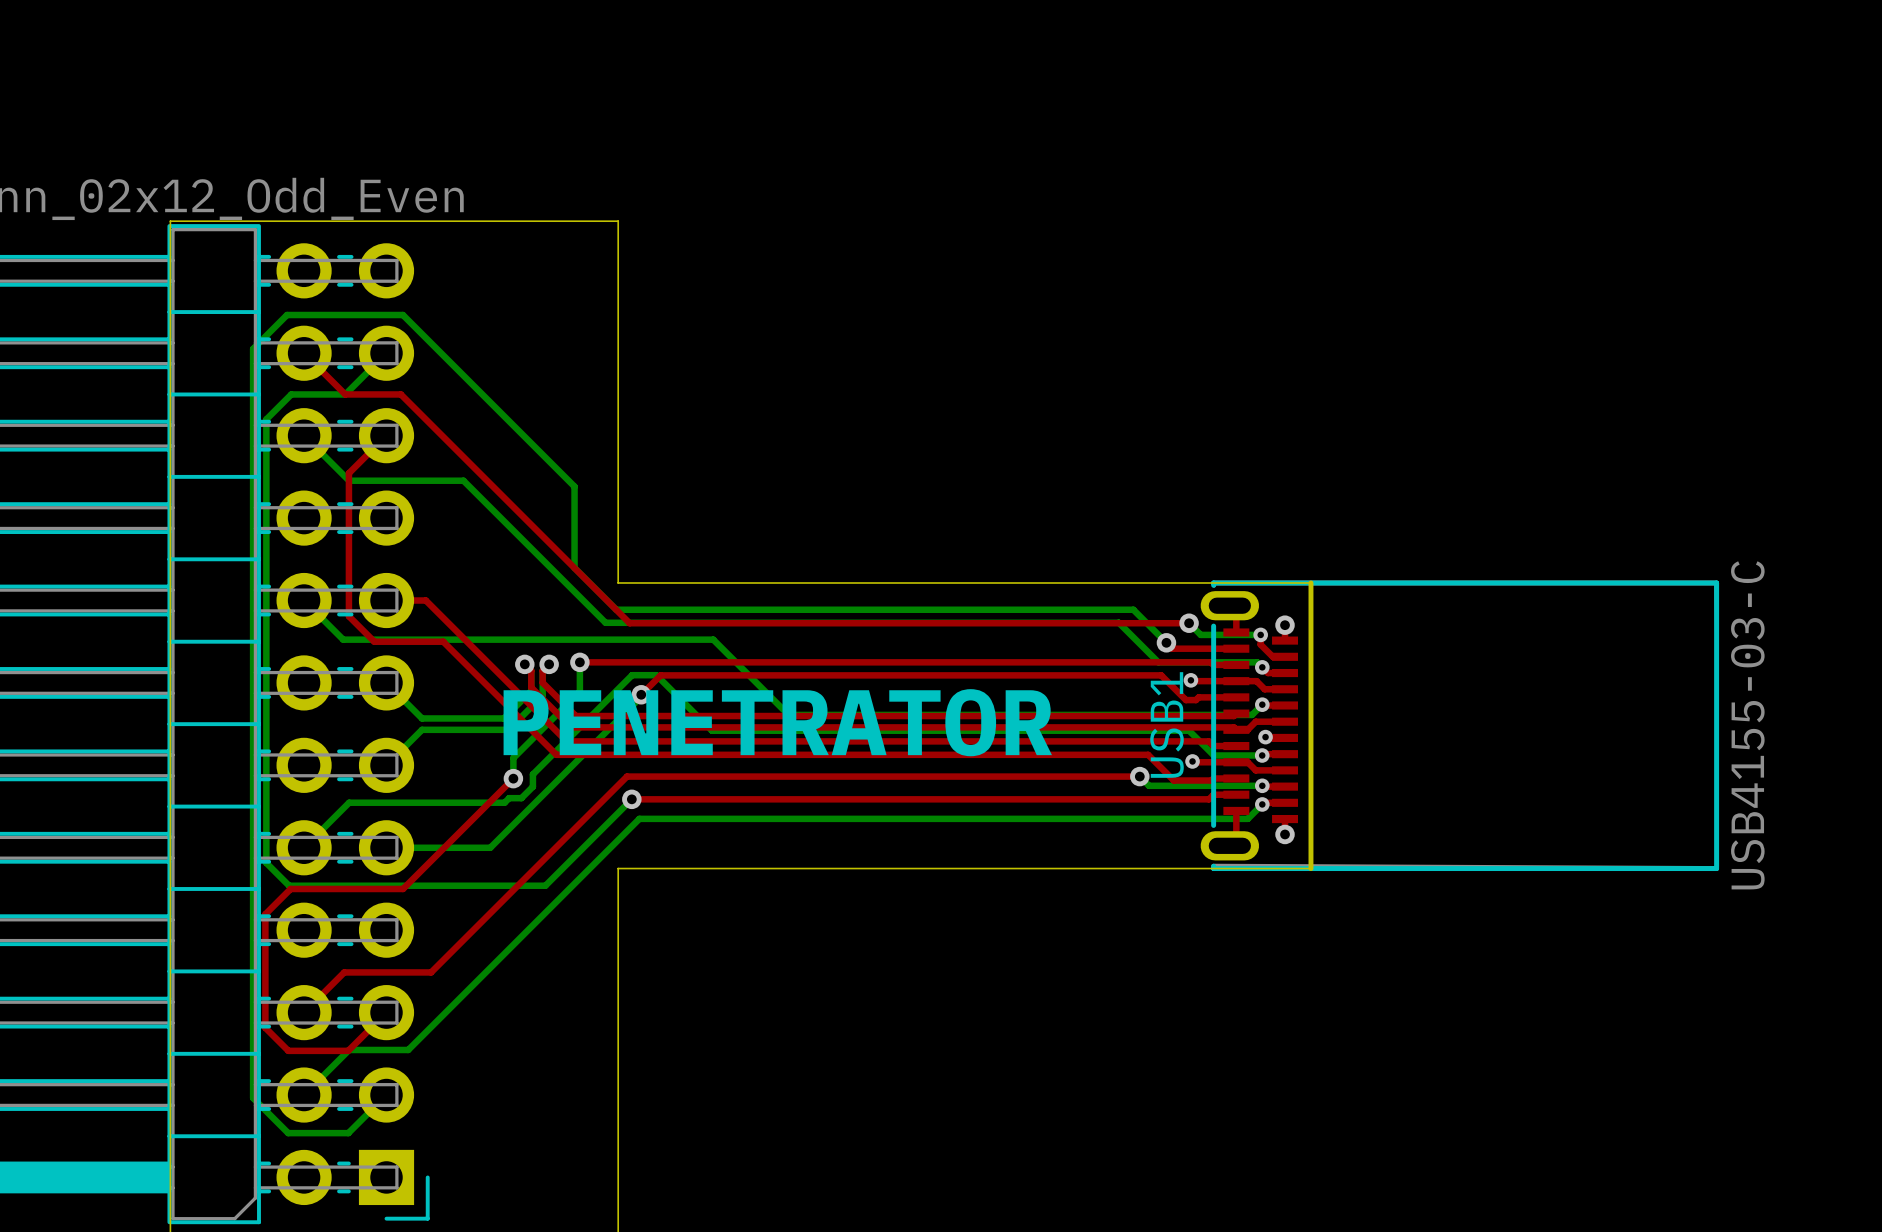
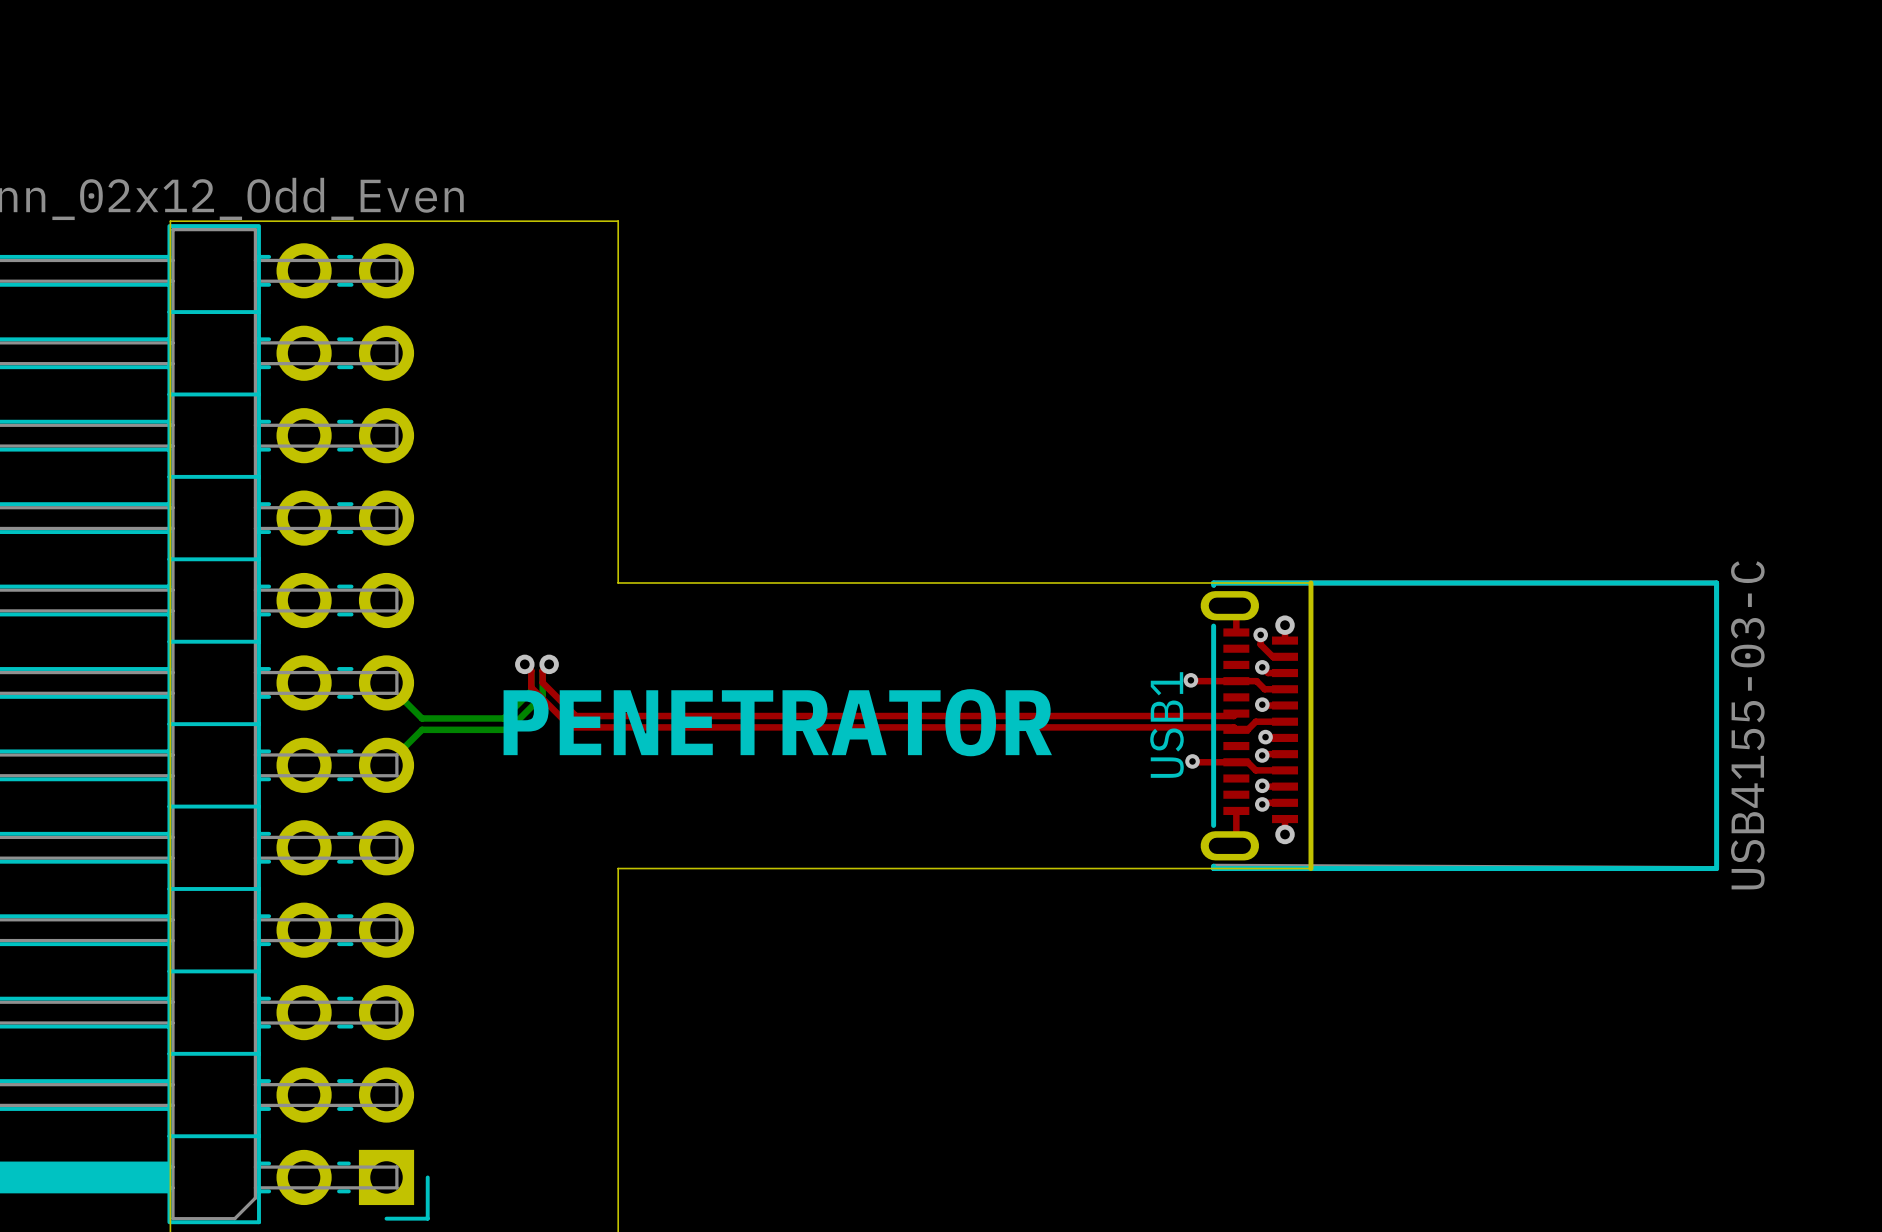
top track: (304, 353) (345, 394) (400, 394) (629, 623) (1189, 623) -> none
bottom track: (386, 353) (345, 394) (291, 394) (266, 419) (266, 862) (289, 885) (545, 885) (631, 799) -> none
bottom track: (304, 435) (349, 480) (463, 480) (605, 622) (1118, 622) (1158, 662) (1257, 662) (1262, 667) -> none
top track: (386, 435) (348, 473) (348, 616) (374, 641) (443, 641) (556, 754) (1148, 754) (1173, 780) (1236, 778) -> none
bottom track: (304, 600) (343, 639) (713, 639) (788, 714) (1252, 714) (1262, 704) -> none
top track: (386, 600) (425, 600) (566, 741) (1208, 741) (1213, 746) (1236, 746) -> none
bottom track: (1189, 623) (1200, 634) (1260, 634) -> none
via: (1189, 623) -> none
top track: (1166, 642) (1172, 648) (1236, 648) -> none
bottom track: (1166, 642) (1133, 609) (616, 609) (574, 567) (574, 486) (402, 315) (287, 315) (253, 348) (253, 1098) (288, 1133) (348, 1133) (386, 1095) -> none
via: (1166, 642) -> none
top track: (579, 662) (1210, 662) (1213, 664) (1236, 664) -> none
bottom track: (579, 662) (579, 691) (513, 758) (513, 778) -> none
via: (579, 662) -> none
top track: (641, 694) (660, 675) (1161, 675) (1185, 700) (1196, 700) (1198, 697) (1236, 697) -> none
bottom track: (641, 694) (490, 847) (386, 847) -> none
via: (641, 694) -> none
bottom track: (1262, 755) (1213, 755) (1189, 730) (712, 730) (656, 675) (632, 675) (532, 774) (532, 786) (521, 798) (509, 798) (504, 802) (349, 802) (304, 847) -> none
top track: (1139, 776) (626, 776) (431, 972) (344, 972) (304, 1012) -> none
bottom track: (1139, 776) (1149, 785) (1262, 785) -> none
via: (1139, 776) -> none
top track: (513, 778) (403, 888) (290, 888) (265, 914) (265, 1027) (288, 1050) (348, 1050) (386, 1012) -> none
via: (513, 778) -> none
top track: (1236, 794) (1213, 794) (1208, 799) (631, 799) -> none
via: (631, 799) -> none
bottom track: (1262, 804) (1247, 818) (639, 818) (408, 1049) (349, 1049) (304, 1095) -> none

